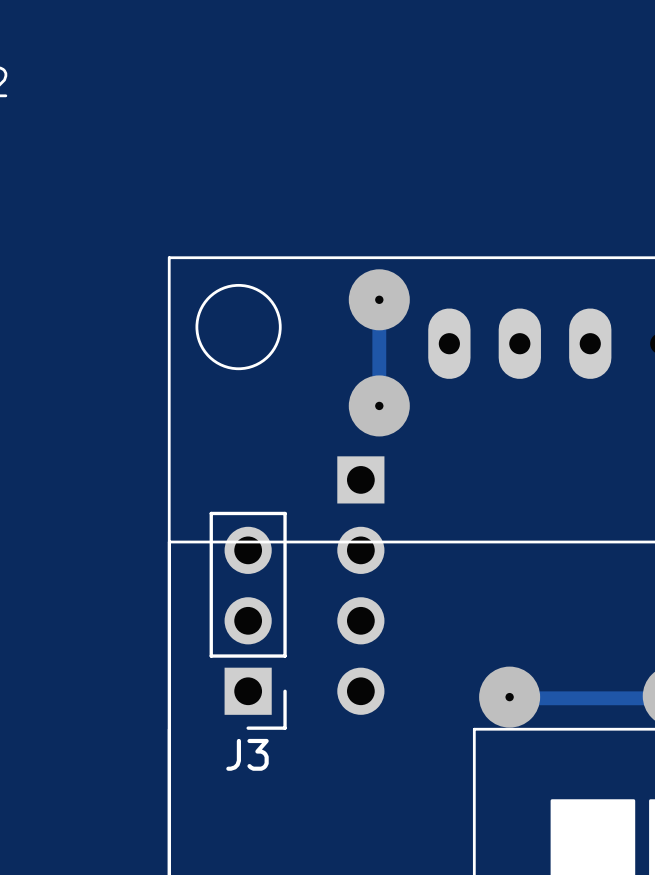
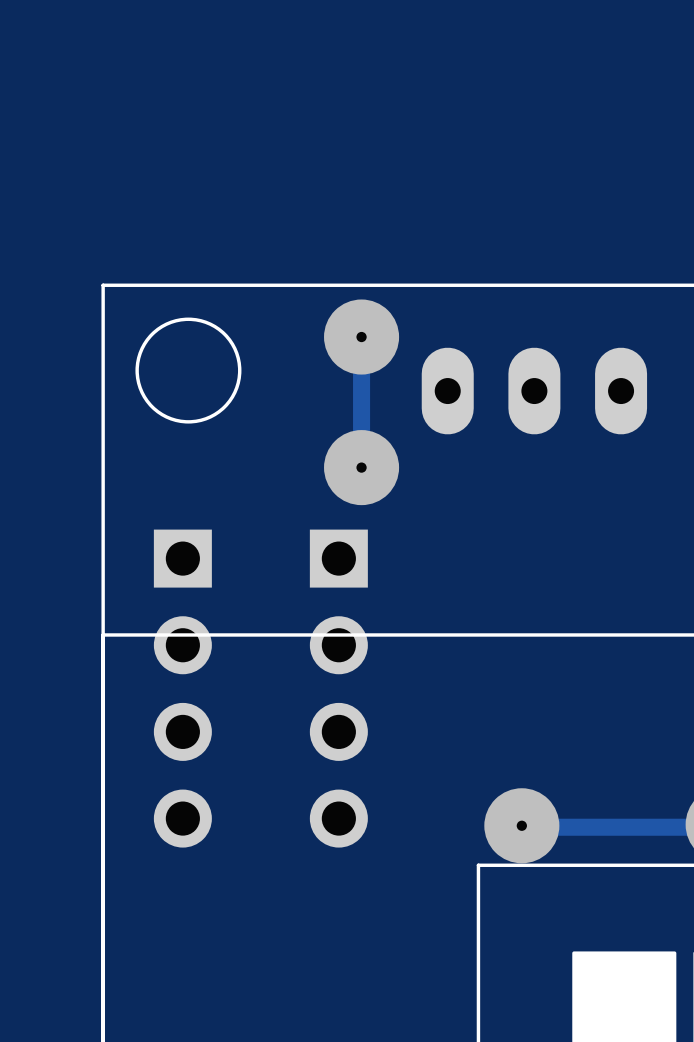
part: none -> (182, 688)
J3: (248, 620) -> none

